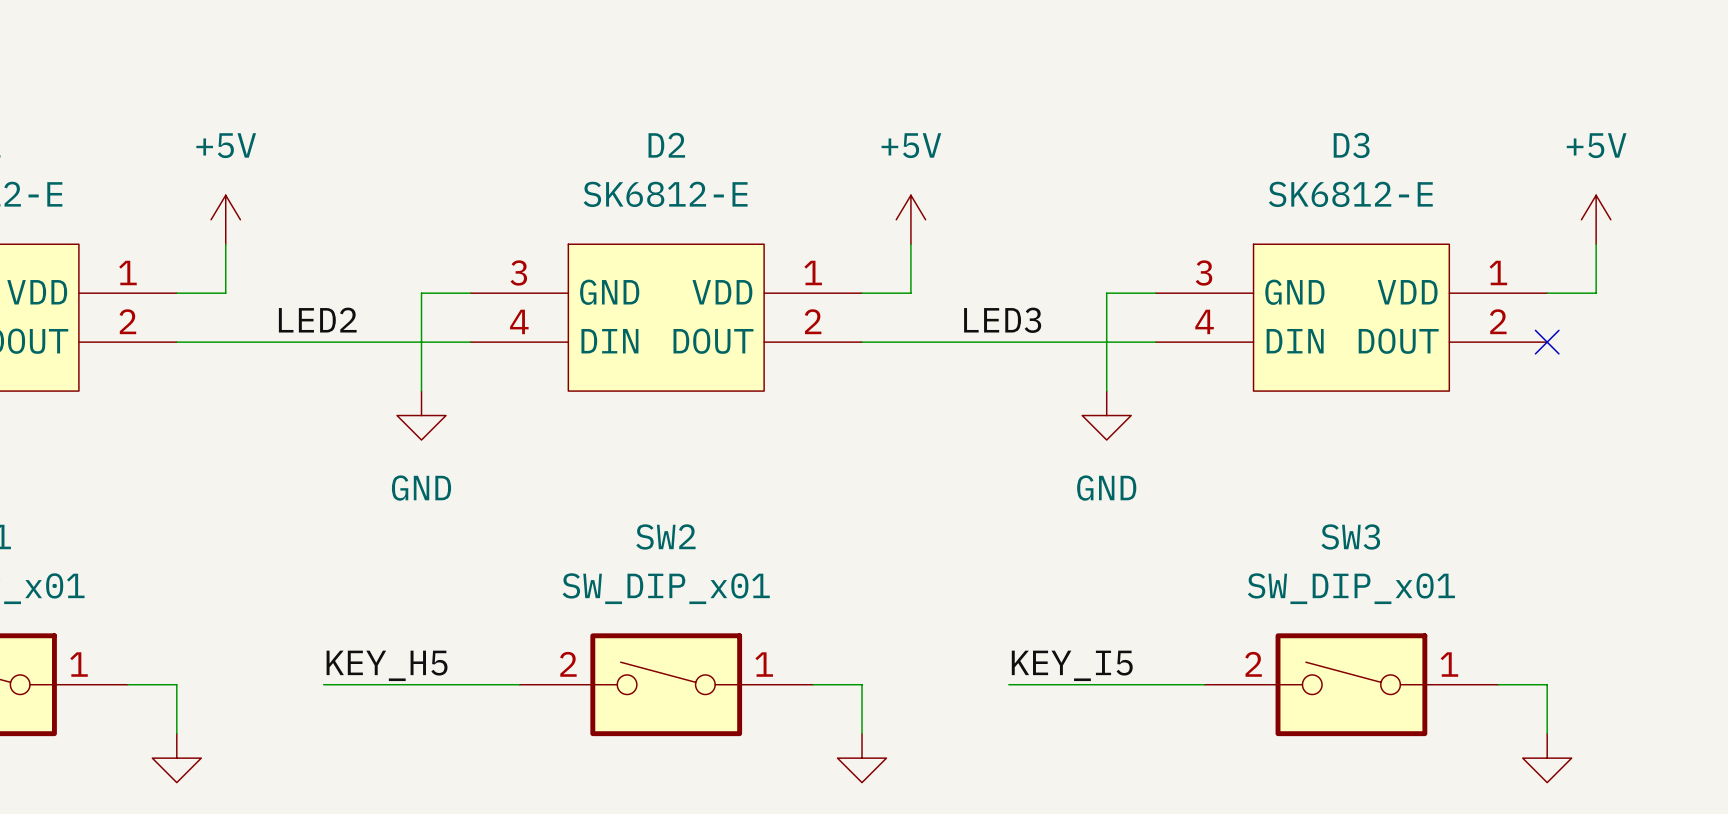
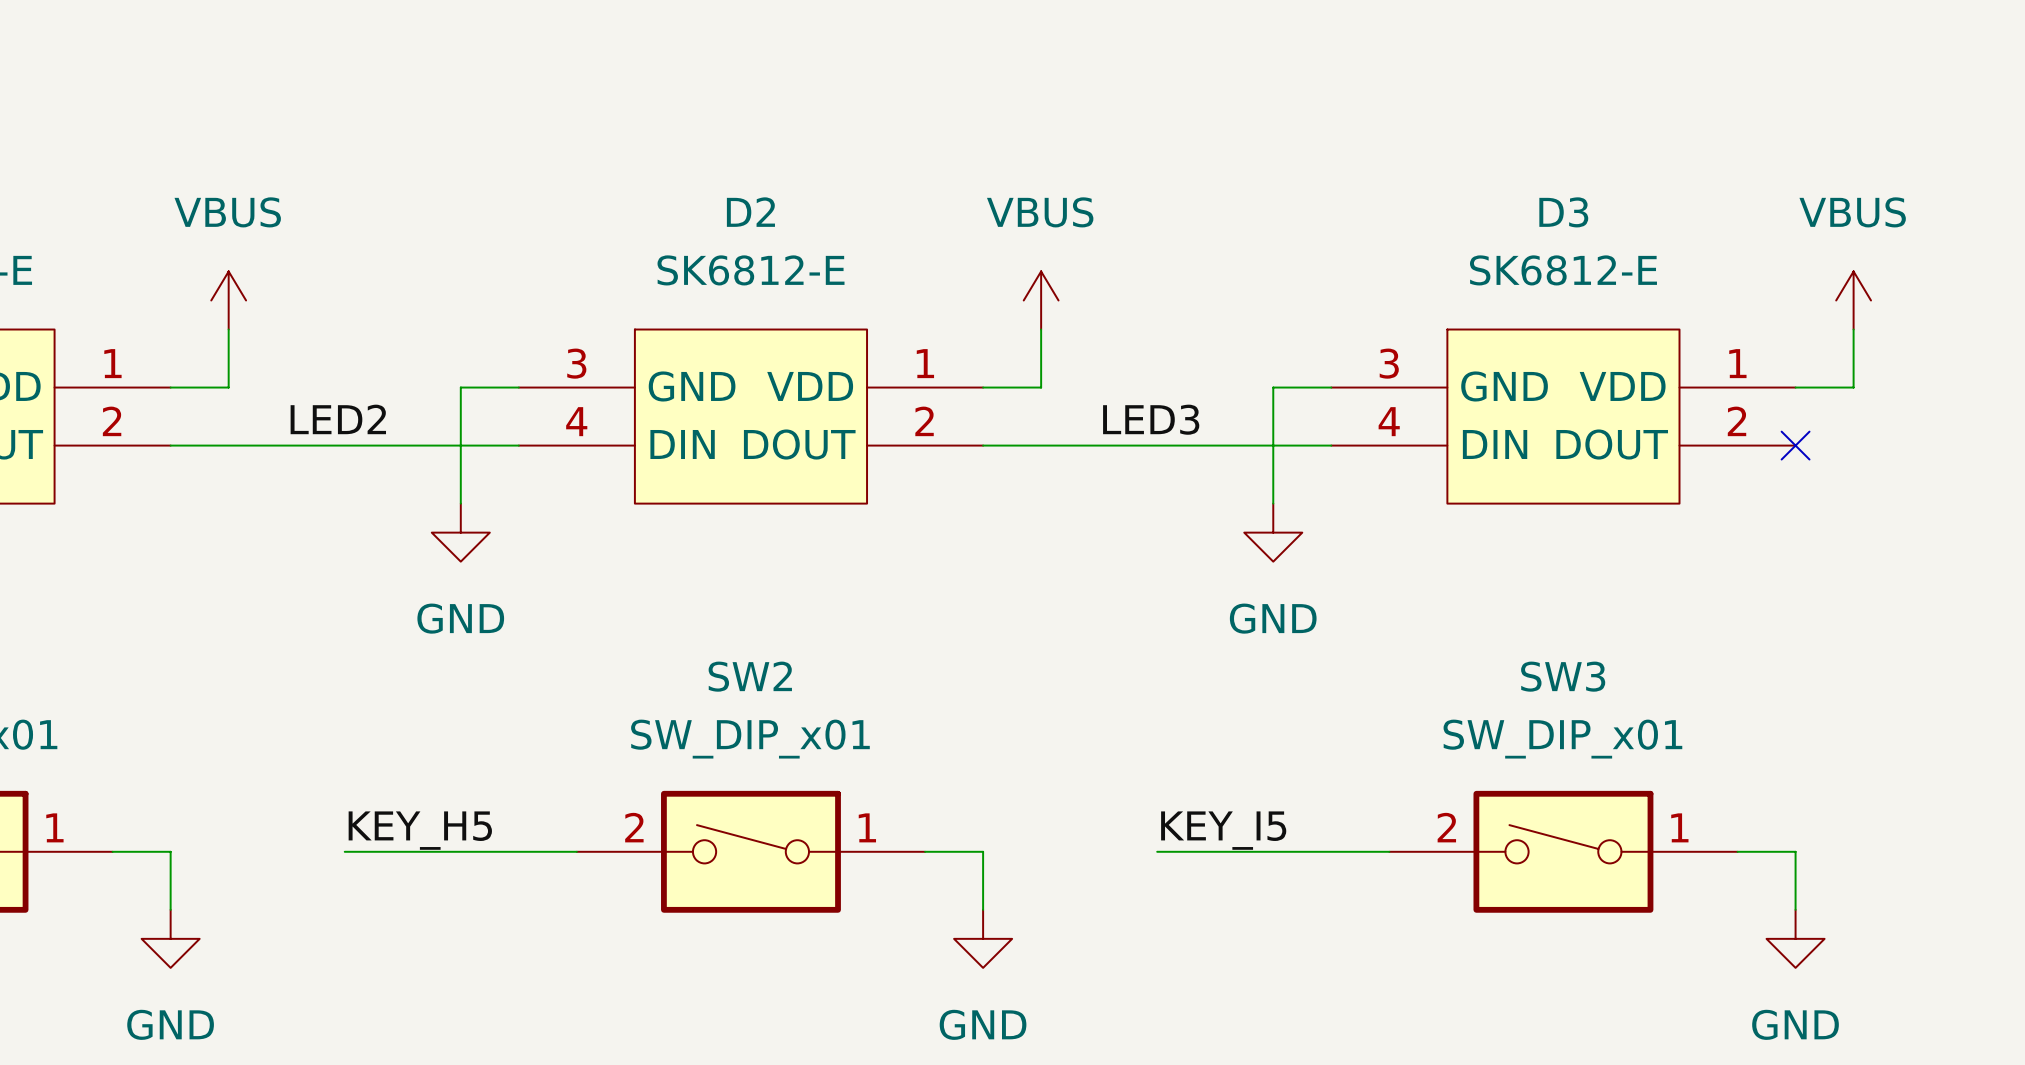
power symbol: +5V (225, 219) -> VBUS (228, 300)
power symbol: +5V (910, 219) -> VBUS (1041, 300)
power symbol: +5V (1596, 219) -> VBUS (1853, 300)

